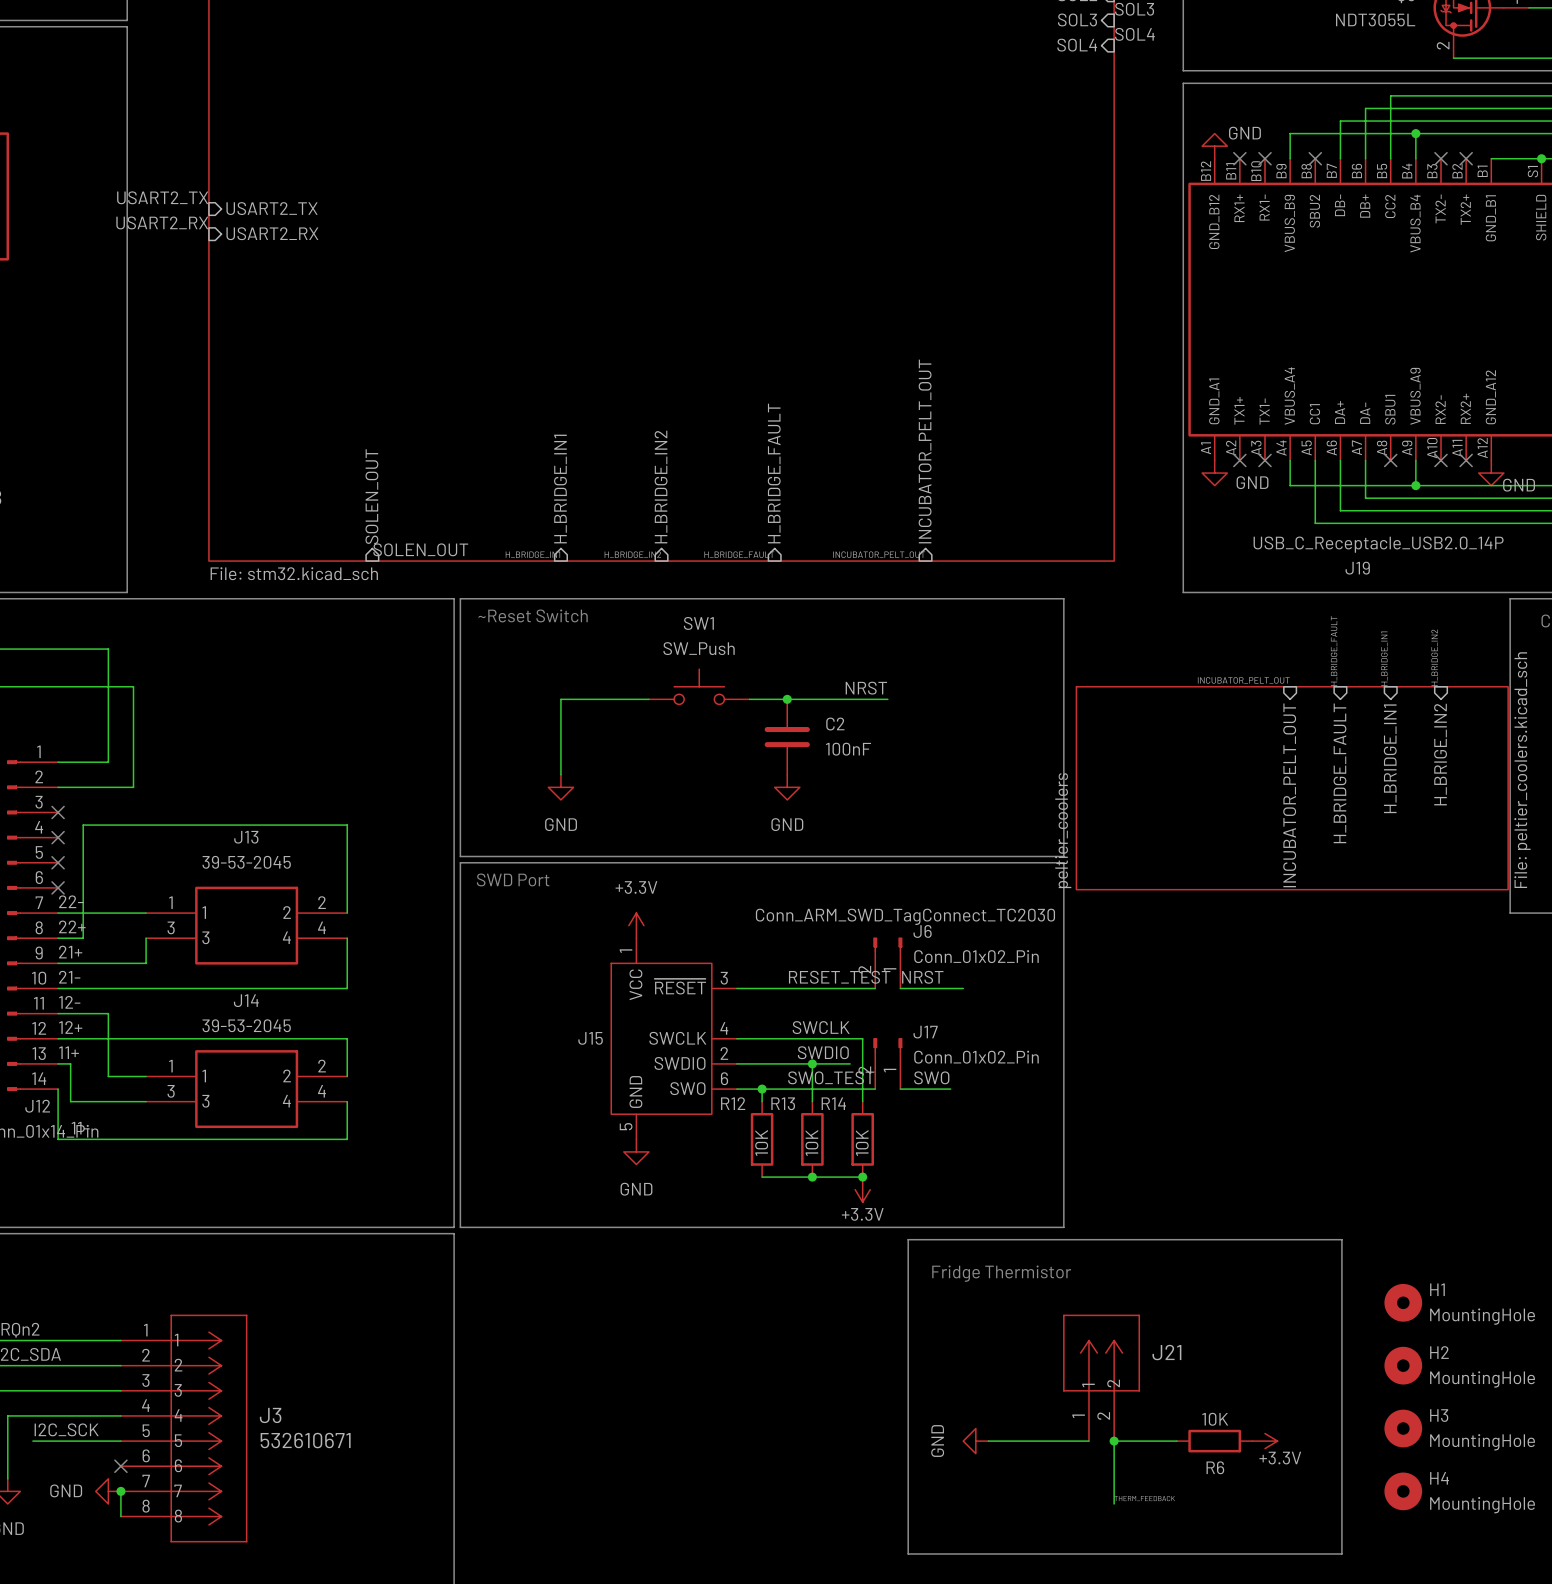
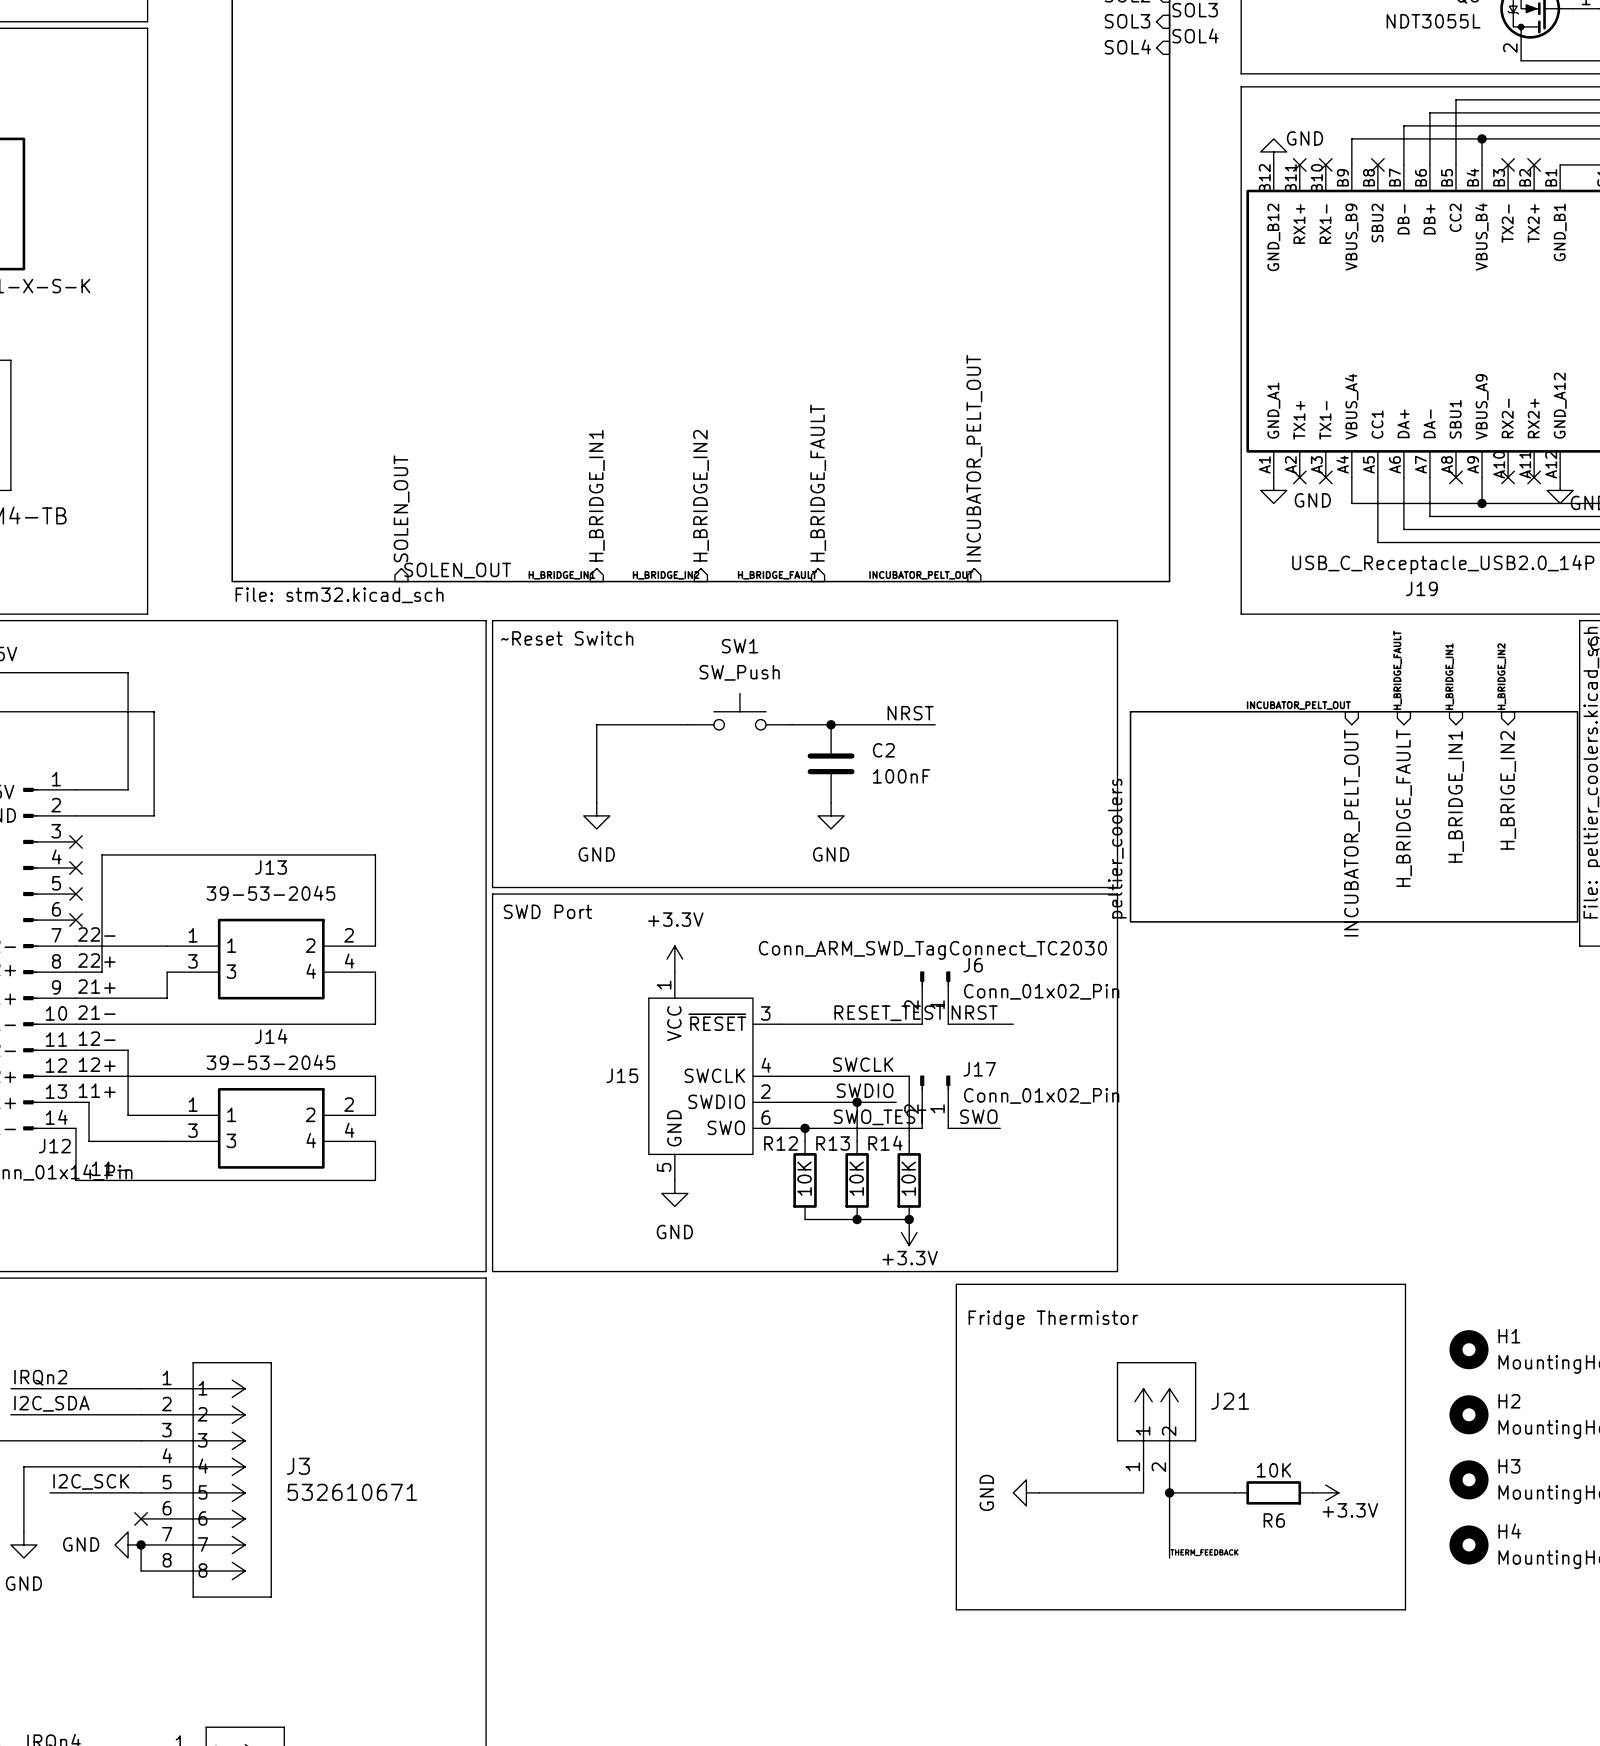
label: USART2_TX (162, 197) -> none
sheet pin: USART2_TX (272, 208) -> none
label: USART2_RX (162, 222) -> none
sheet pin: USART2_RX (272, 233) -> none

